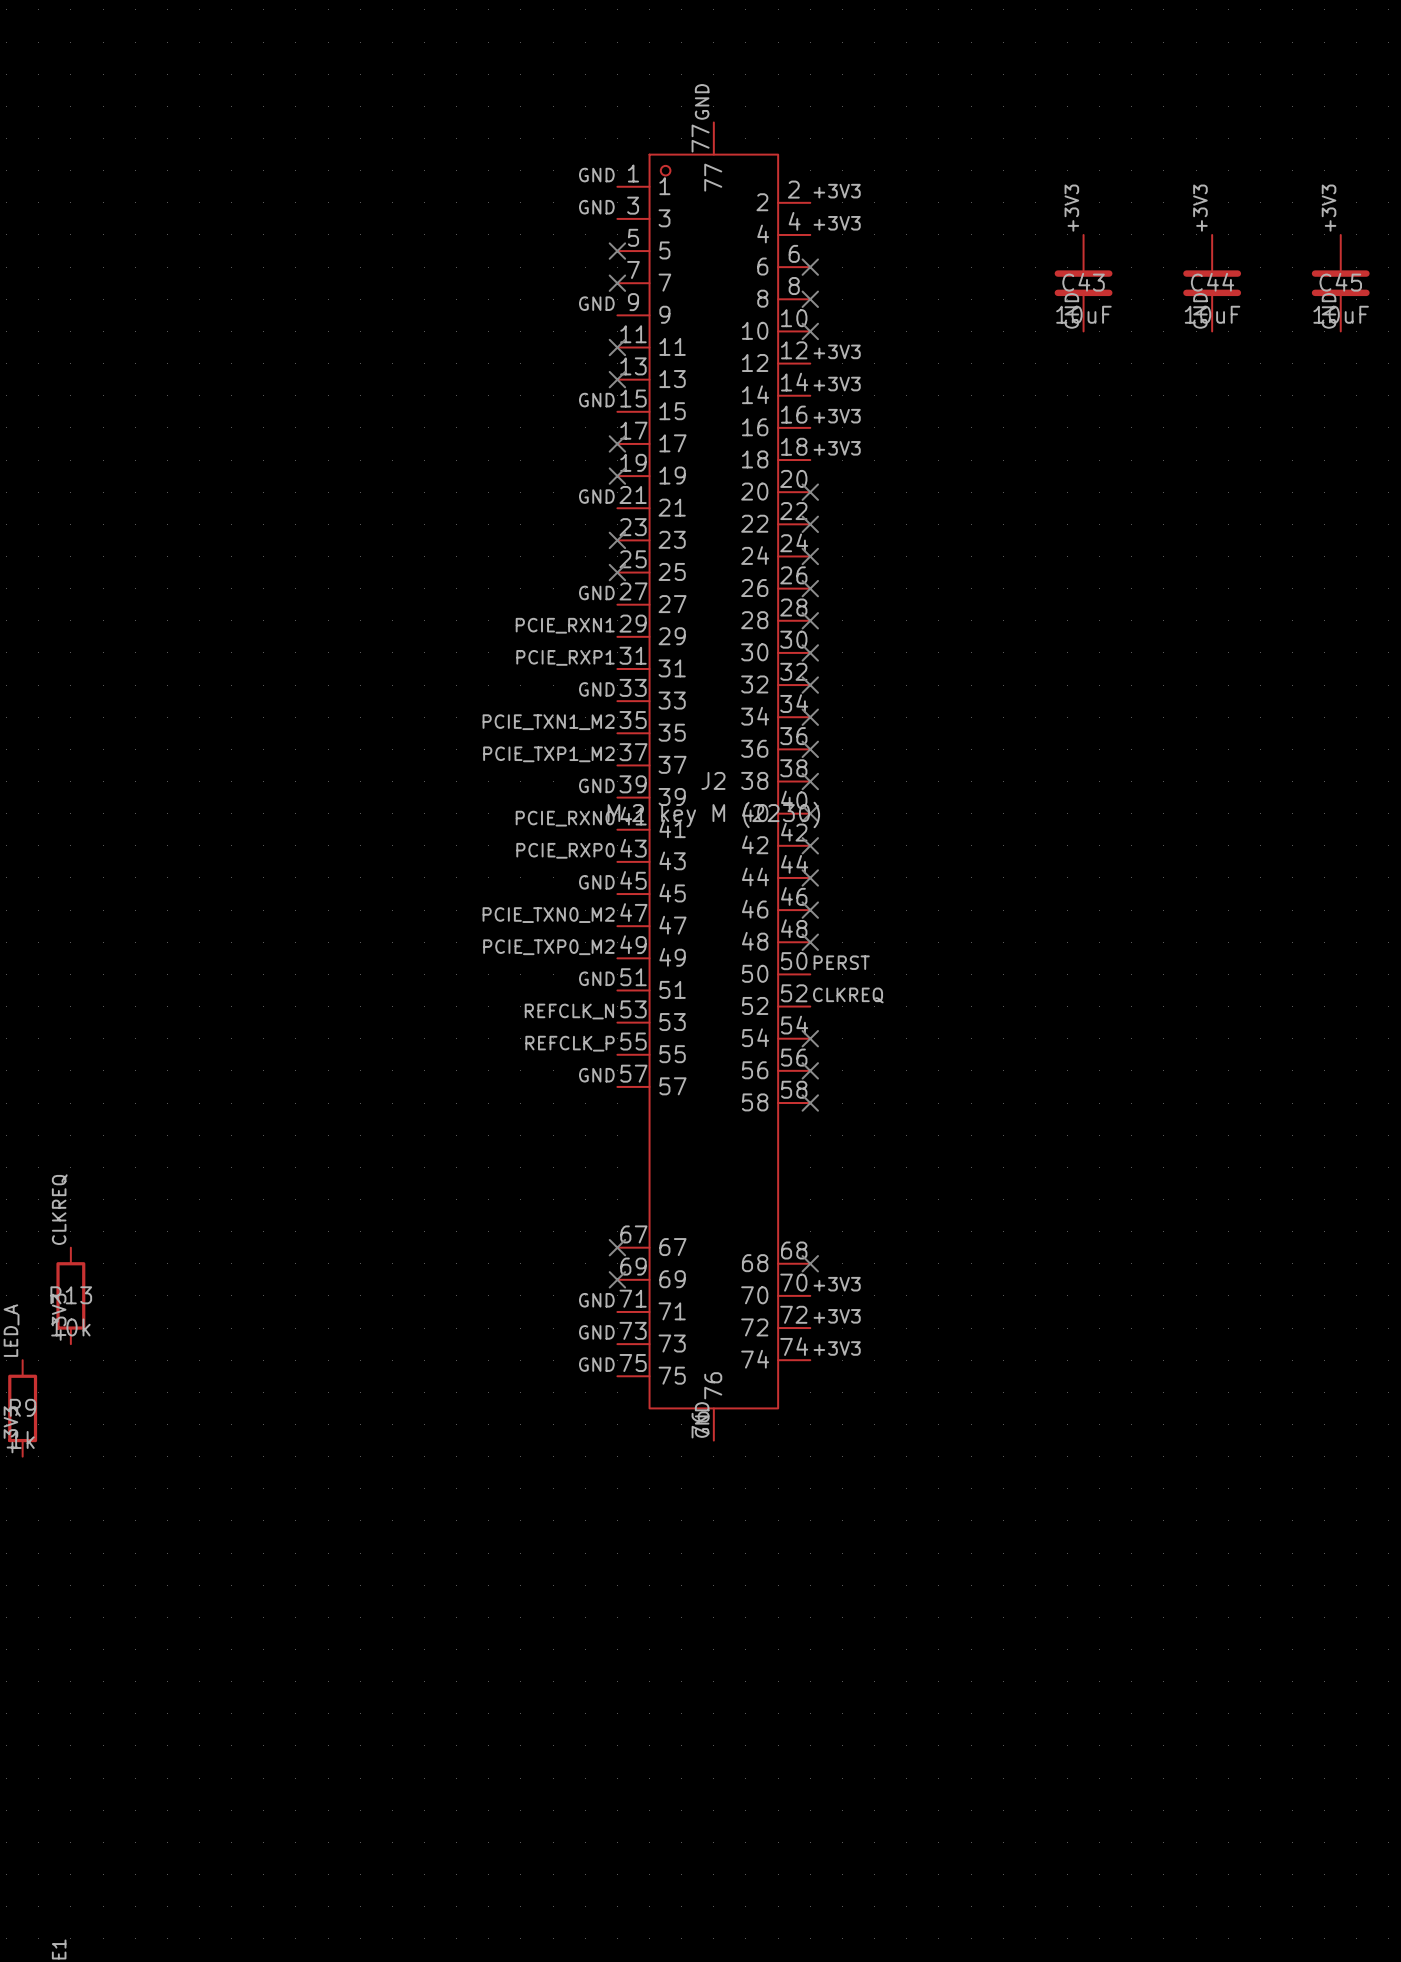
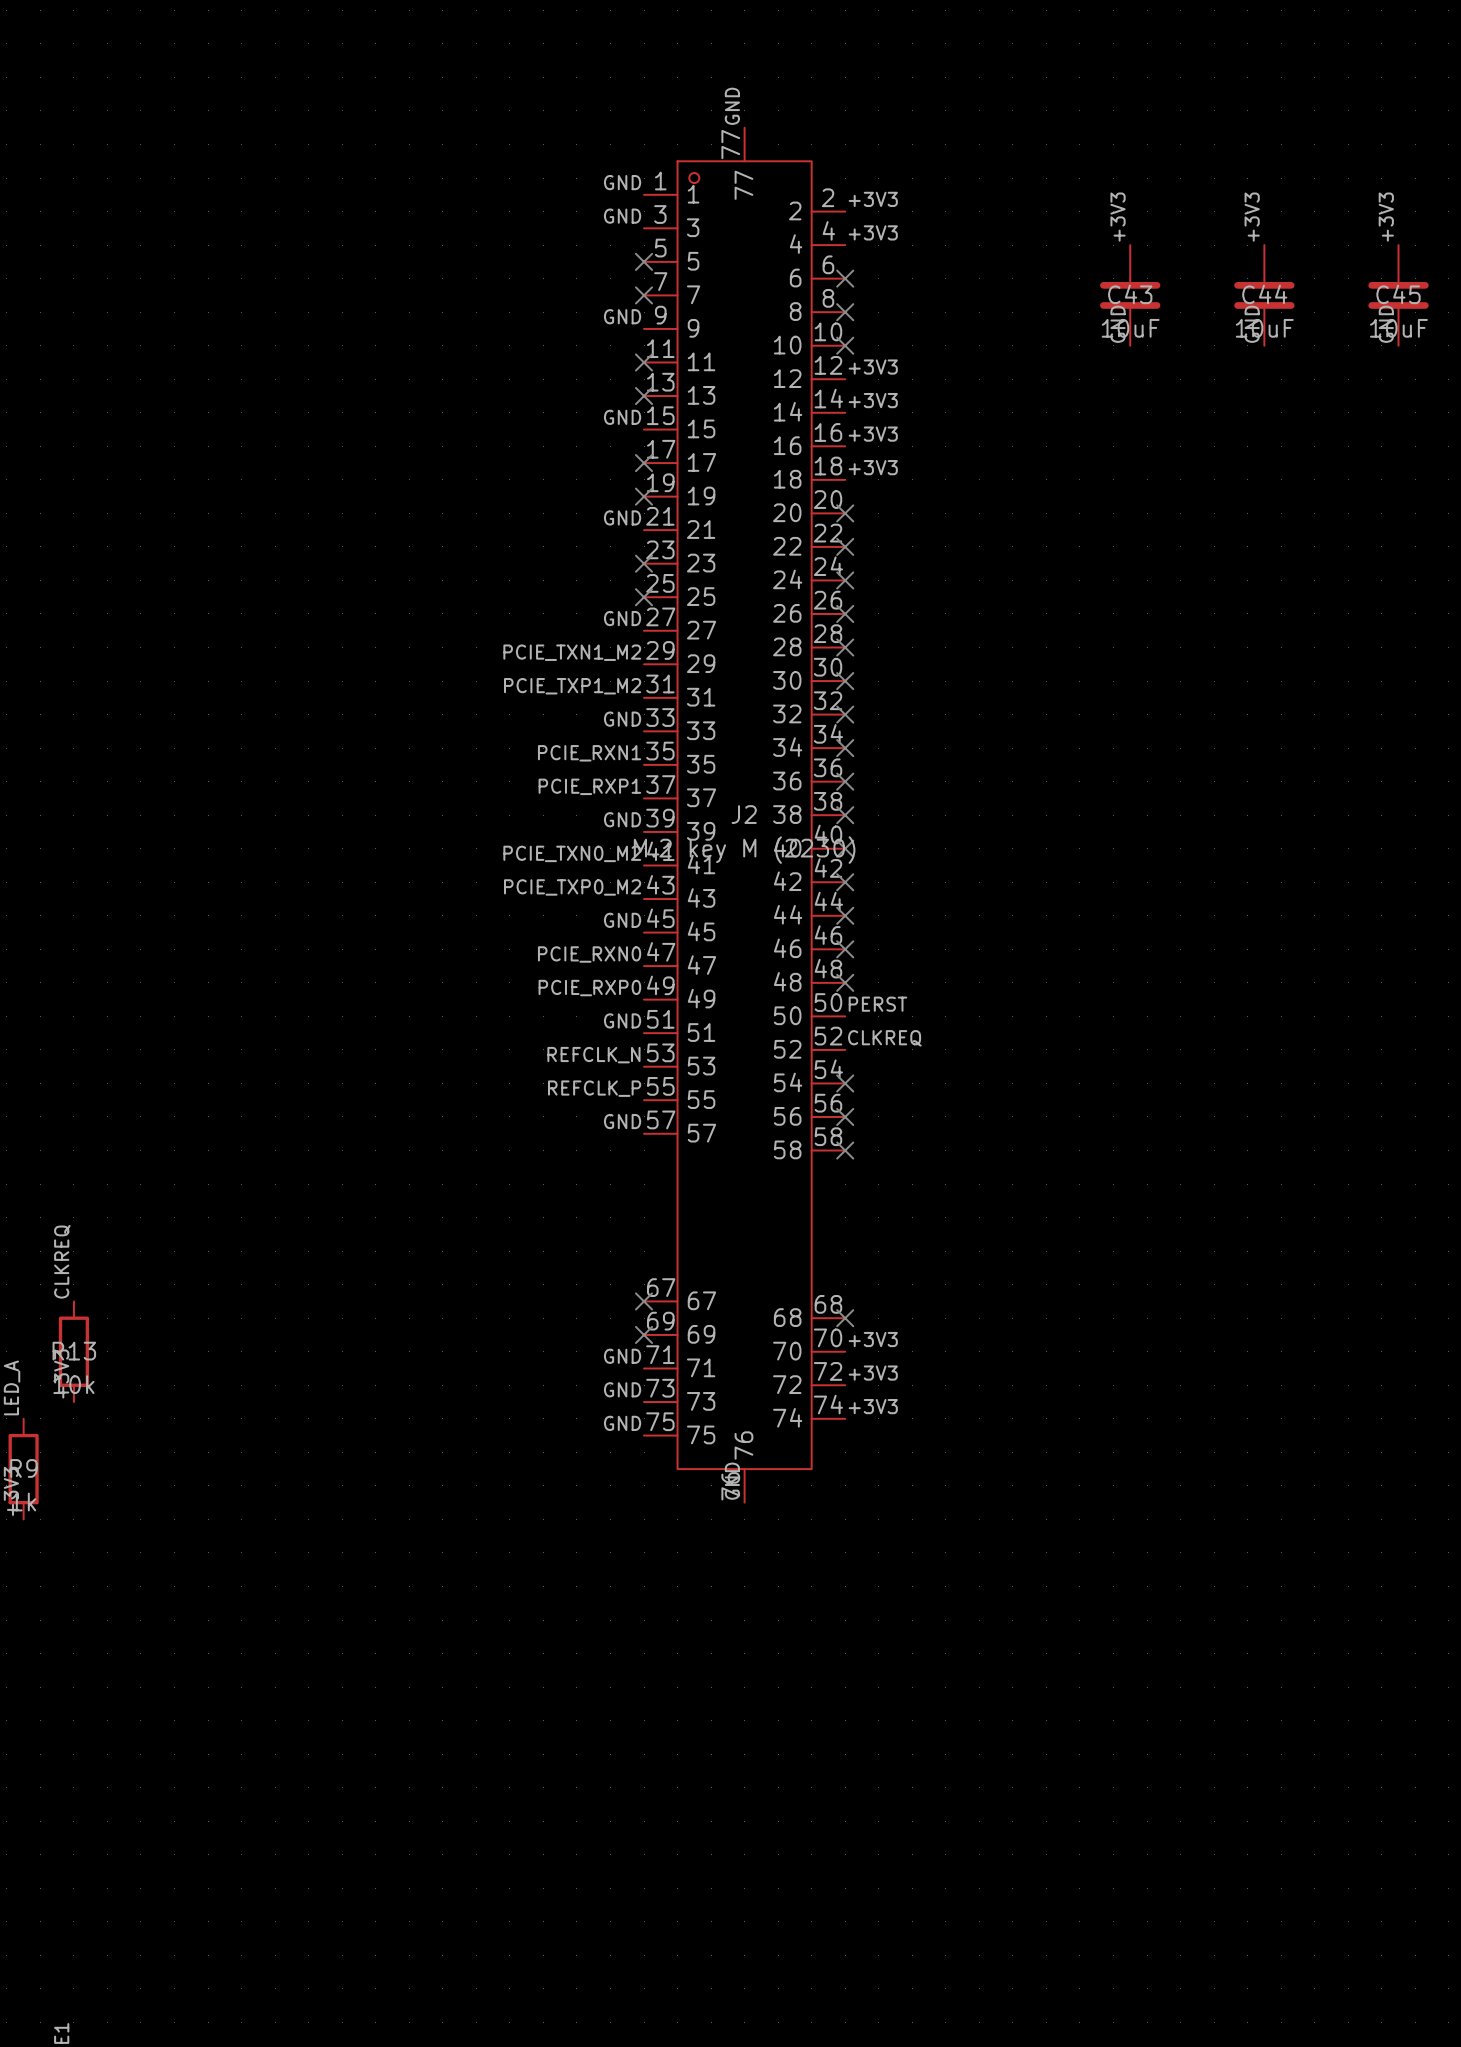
label: PCIE_RXN1 (565, 625) -> PCIE_TXN1_M2 (572, 652)
label: PCIE_RXP1 (565, 657) -> PCIE_TXP1_M2 (572, 686)
label: PCIE_TXN1_M2 (548, 722) -> PCIE_RXN1 (589, 753)
label: PCIE_TXP1_M2 (548, 754) -> PCIE_RXP1 (589, 786)
label: PCIE_RXN0 (565, 818) -> PCIE_TXN0_M2 (572, 853)
label: PCIE_RXP0 (565, 850) -> PCIE_TXP0_M2 (572, 887)
label: PCIE_TXN0_M2 (548, 915) -> PCIE_RXN0 (589, 954)
label: PCIE_TXP0_M2 (548, 947) -> PCIE_RXP0 (589, 988)

